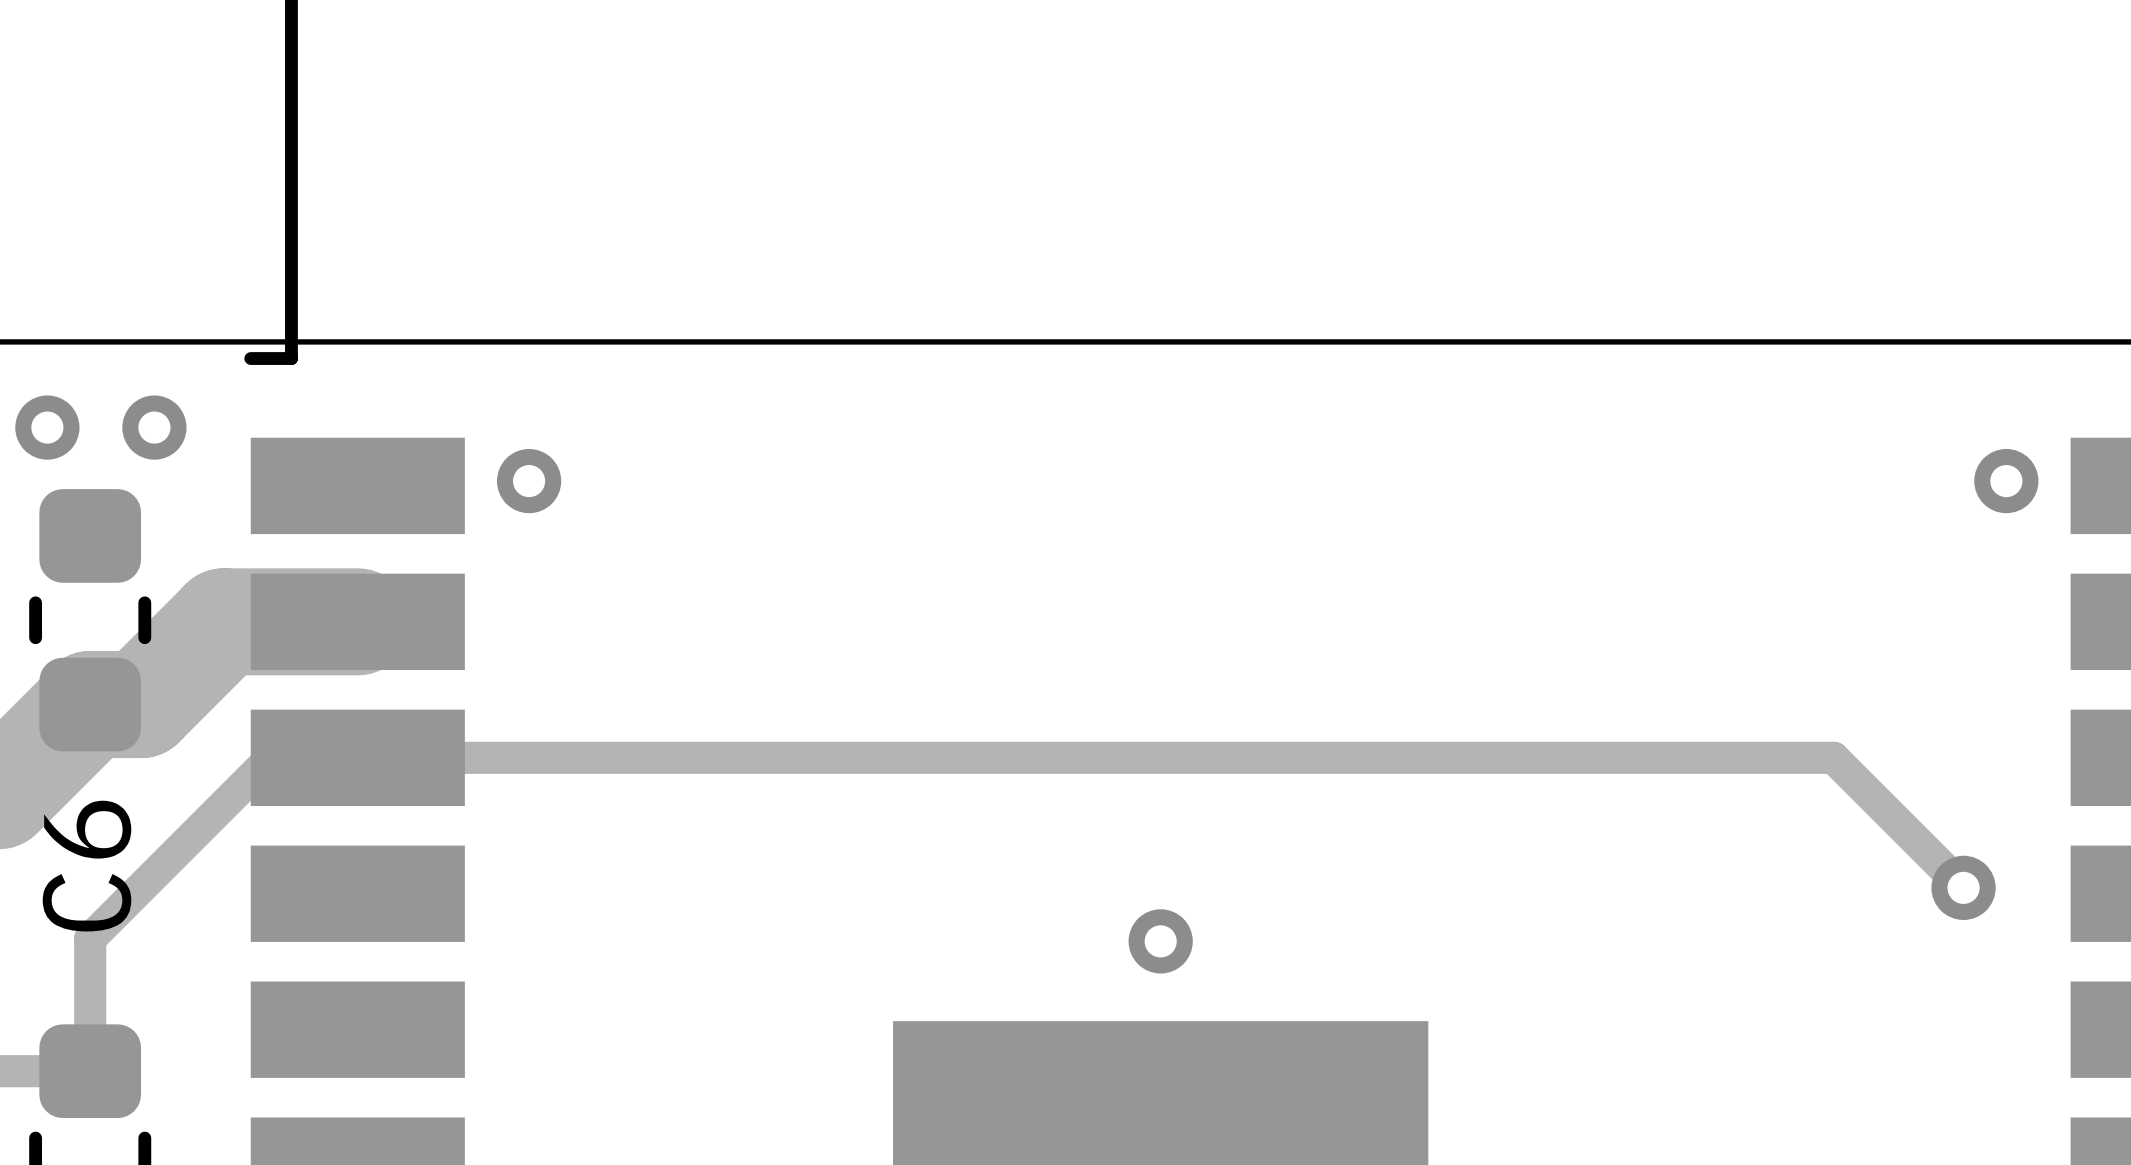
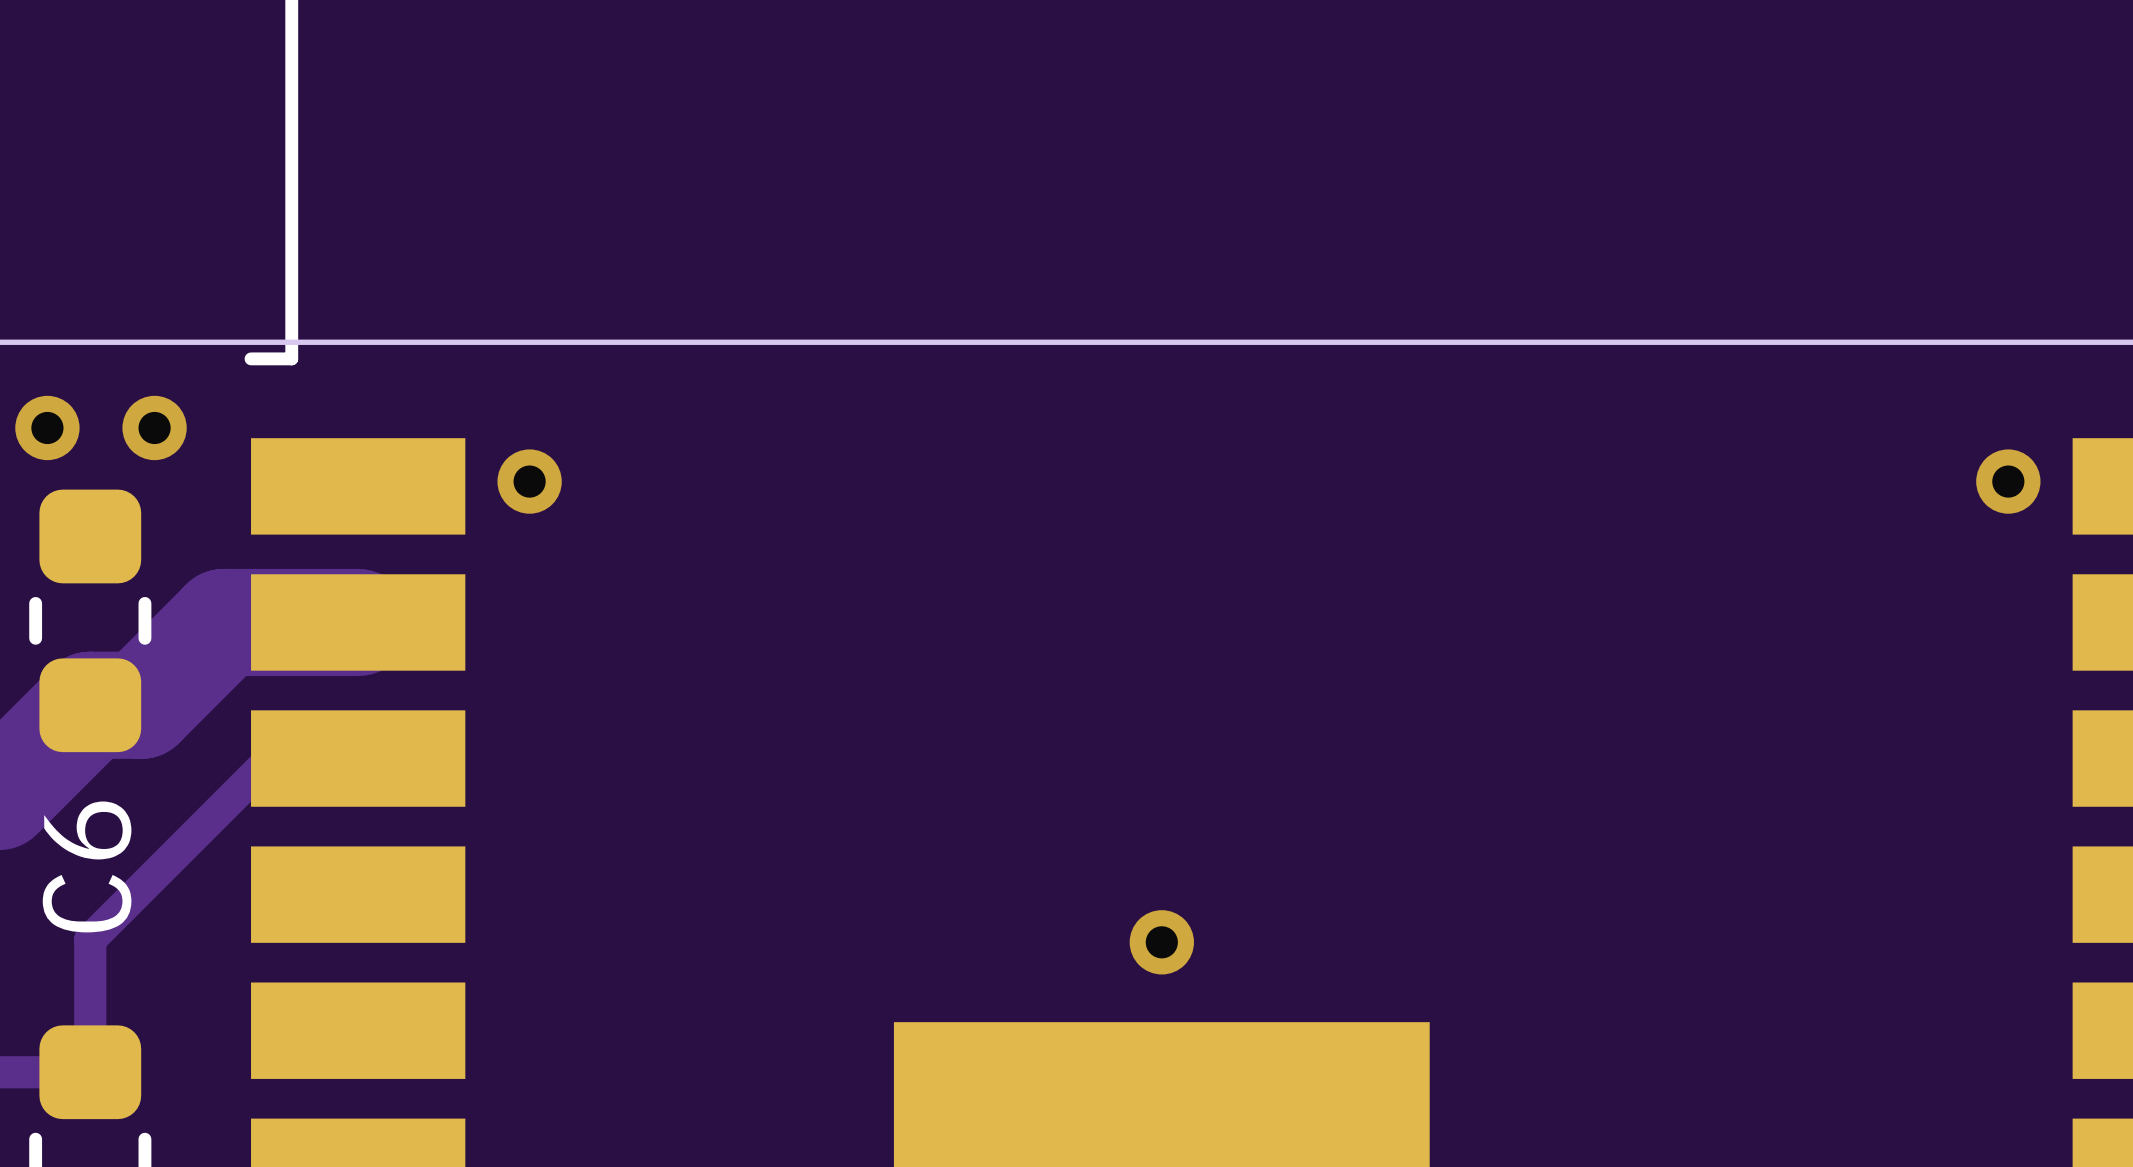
track: (357, 757) (1833, 757) (1963, 887) -> none
via: (1963, 887) -> none

